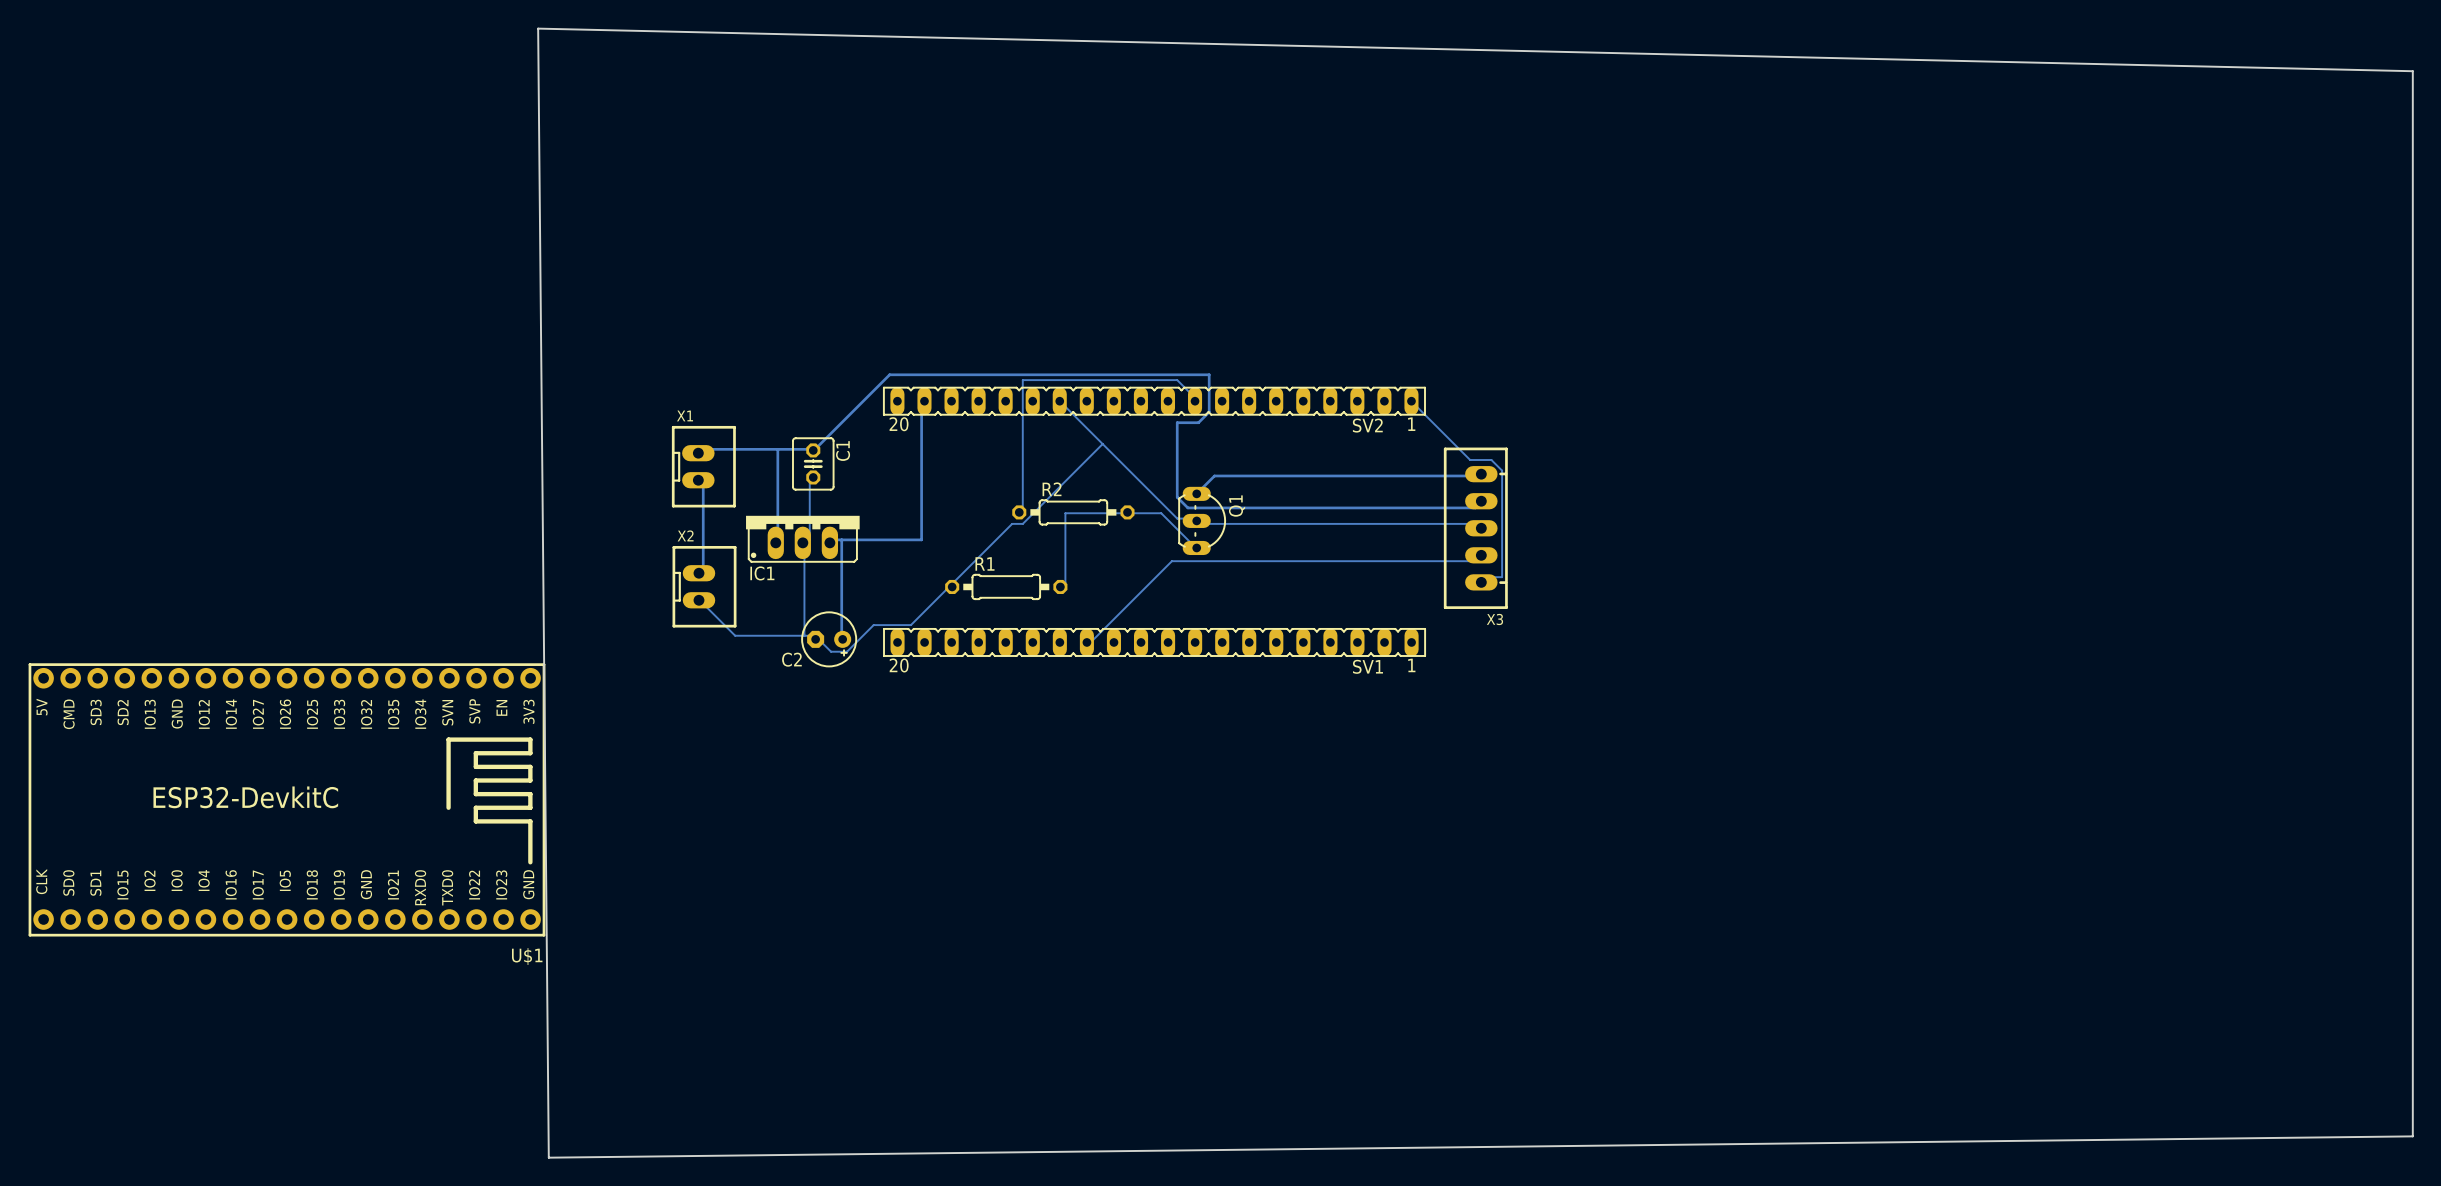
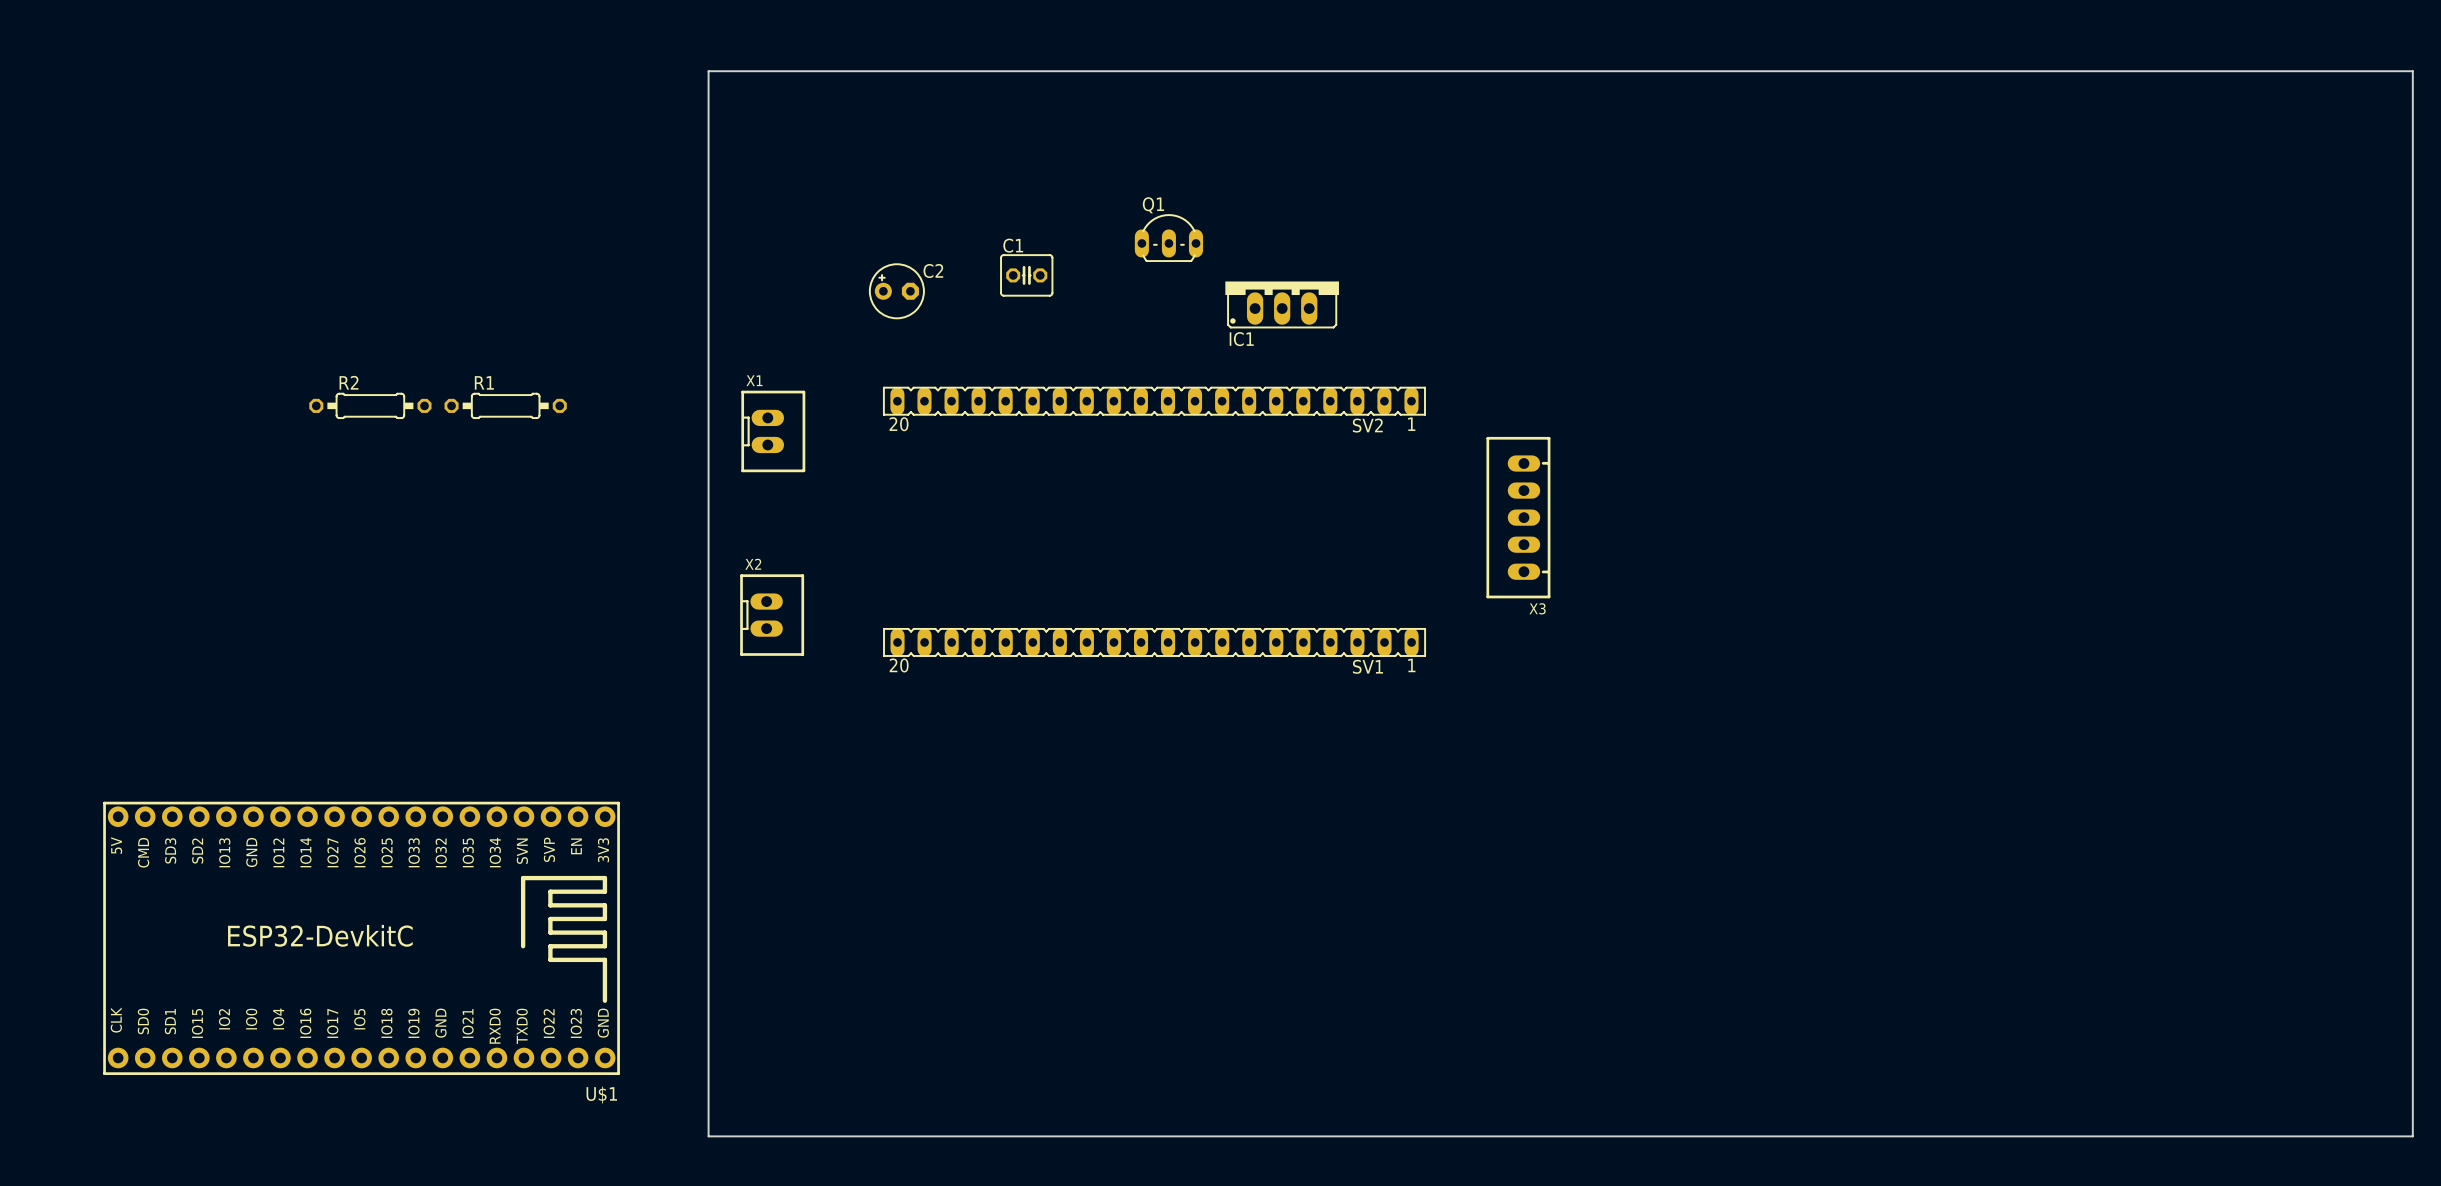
board edge: (2412, 71) (538, 28) (548, 1157) (2412, 1136) -> (2412, 71) (708, 71) (708, 1136) (2412, 1136)
bottom track: (924, 401) (921, 401) (921, 539) (831, 539) (829, 542) -> none
bottom track: (1059, 401) (1177, 518) (1193, 518) (1198, 523) (1480, 523) (1481, 528) -> none
bottom track: (1195, 401) (1193, 396) (1177, 380) (1022, 380) (1022, 507) (1019, 512) -> none
bottom track: (1411, 401) (1470, 460) (1491, 460) (1502, 470) (1502, 577) (1486, 577) (1481, 582) -> none
bottom track: (1102, 444) (1022, 523) (1012, 523) (953, 582) (952, 586) (948, 587) (910, 625) (873, 625) (847, 651) (831, 651) (820, 641) (815, 639) (815, 635) (735, 635) (698, 600) -> none
bottom track: (777, 449) (777, 539) (775, 542) -> none
C1 name position: C1 (843, 451) -> C1 (1013, 245)
bottom track: (698, 453) (703, 449) (813, 450) (889, 374) (1209, 374) (1209, 412) (1198, 422) (1177, 422) (1177, 497) (1187, 507) (1475, 507) (1481, 501) -> none
C1 rotation: 0° (813, 463) -> 90° clockwise (1026, 275)
C1 position: (813, 463) -> (1026, 275)
X1 position: (703, 466) -> (773, 431)
bottom track: (1481, 474) (1480, 475) (1214, 475) (1196, 493) -> none
bottom track: (813, 477) (809, 481) (809, 539) (804, 539) (802, 542) (804, 545) (804, 635) -> none
bottom track: (698, 480) (703, 481) (703, 571) (698, 573) -> none
R2 position: (1073, 512) -> (370, 405)
Q1 rotation: 0° (1202, 520) -> 90° counterclockwise (1168, 238)
Q1 position: (1202, 520) -> (1168, 238)
X3 position: (1475, 528) -> (1518, 517)
IC1 position: (802, 539) -> (1282, 304)
bottom track: (841, 539) (842, 639) -> none
bottom track: (1196, 547) (1161, 513) (1065, 513) (1065, 582) (1060, 586) -> none
bottom track: (1481, 555) (1475, 561) (1171, 561) (1092, 641) (1086, 642) -> none
X2 position: (704, 586) -> (772, 615)
R1 position: (1006, 586) -> (505, 405)
C2 rotation: 0° (829, 639) -> 180° (896, 291)
C2 position: (829, 639) -> (896, 291)
U$1 position: (286, 799) -> (361, 938)

